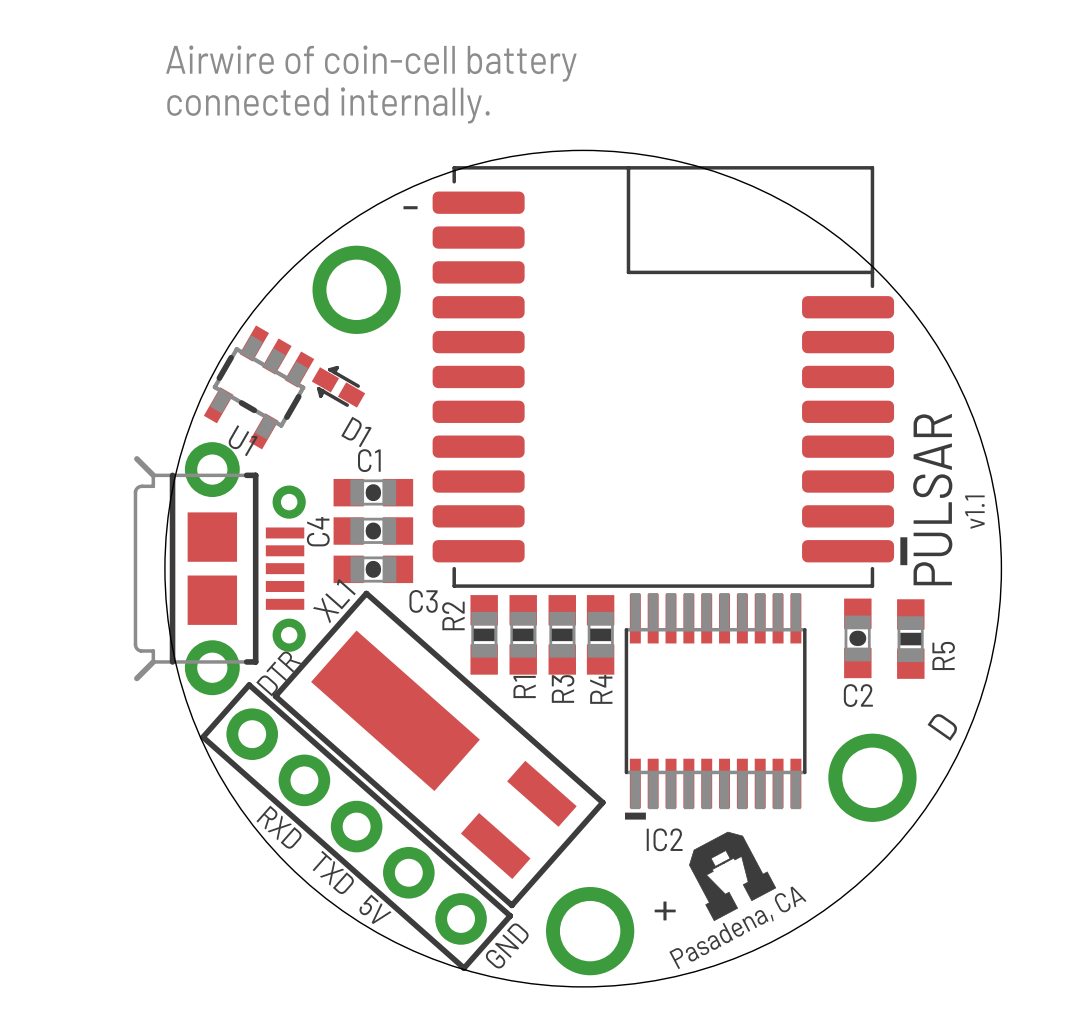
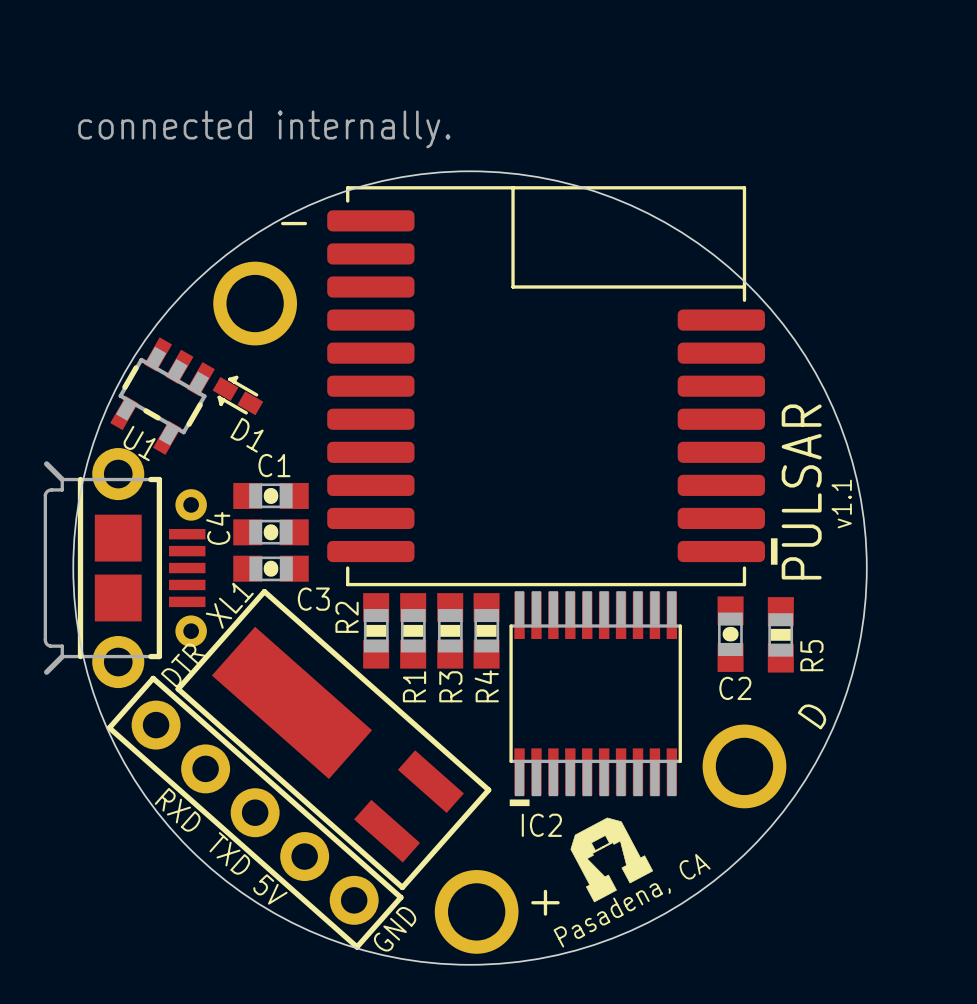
text: Airwire of coin-cell battery (371, 63) -> none

